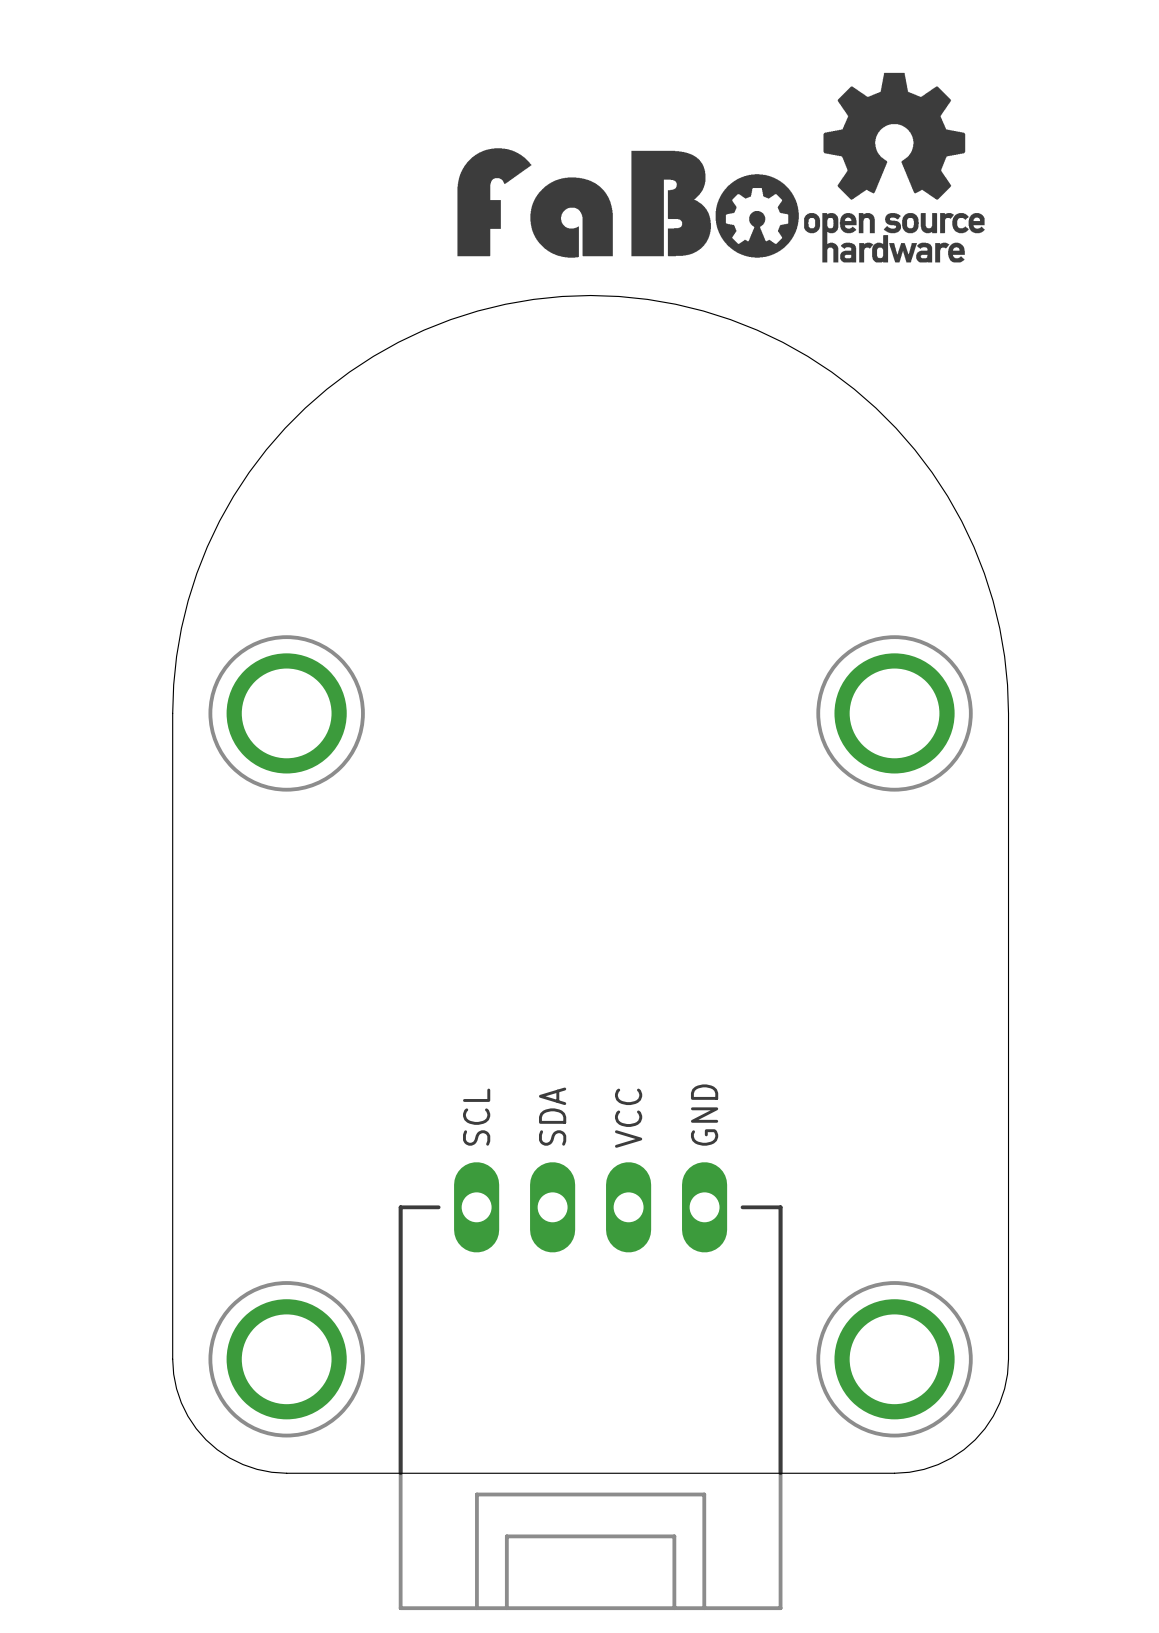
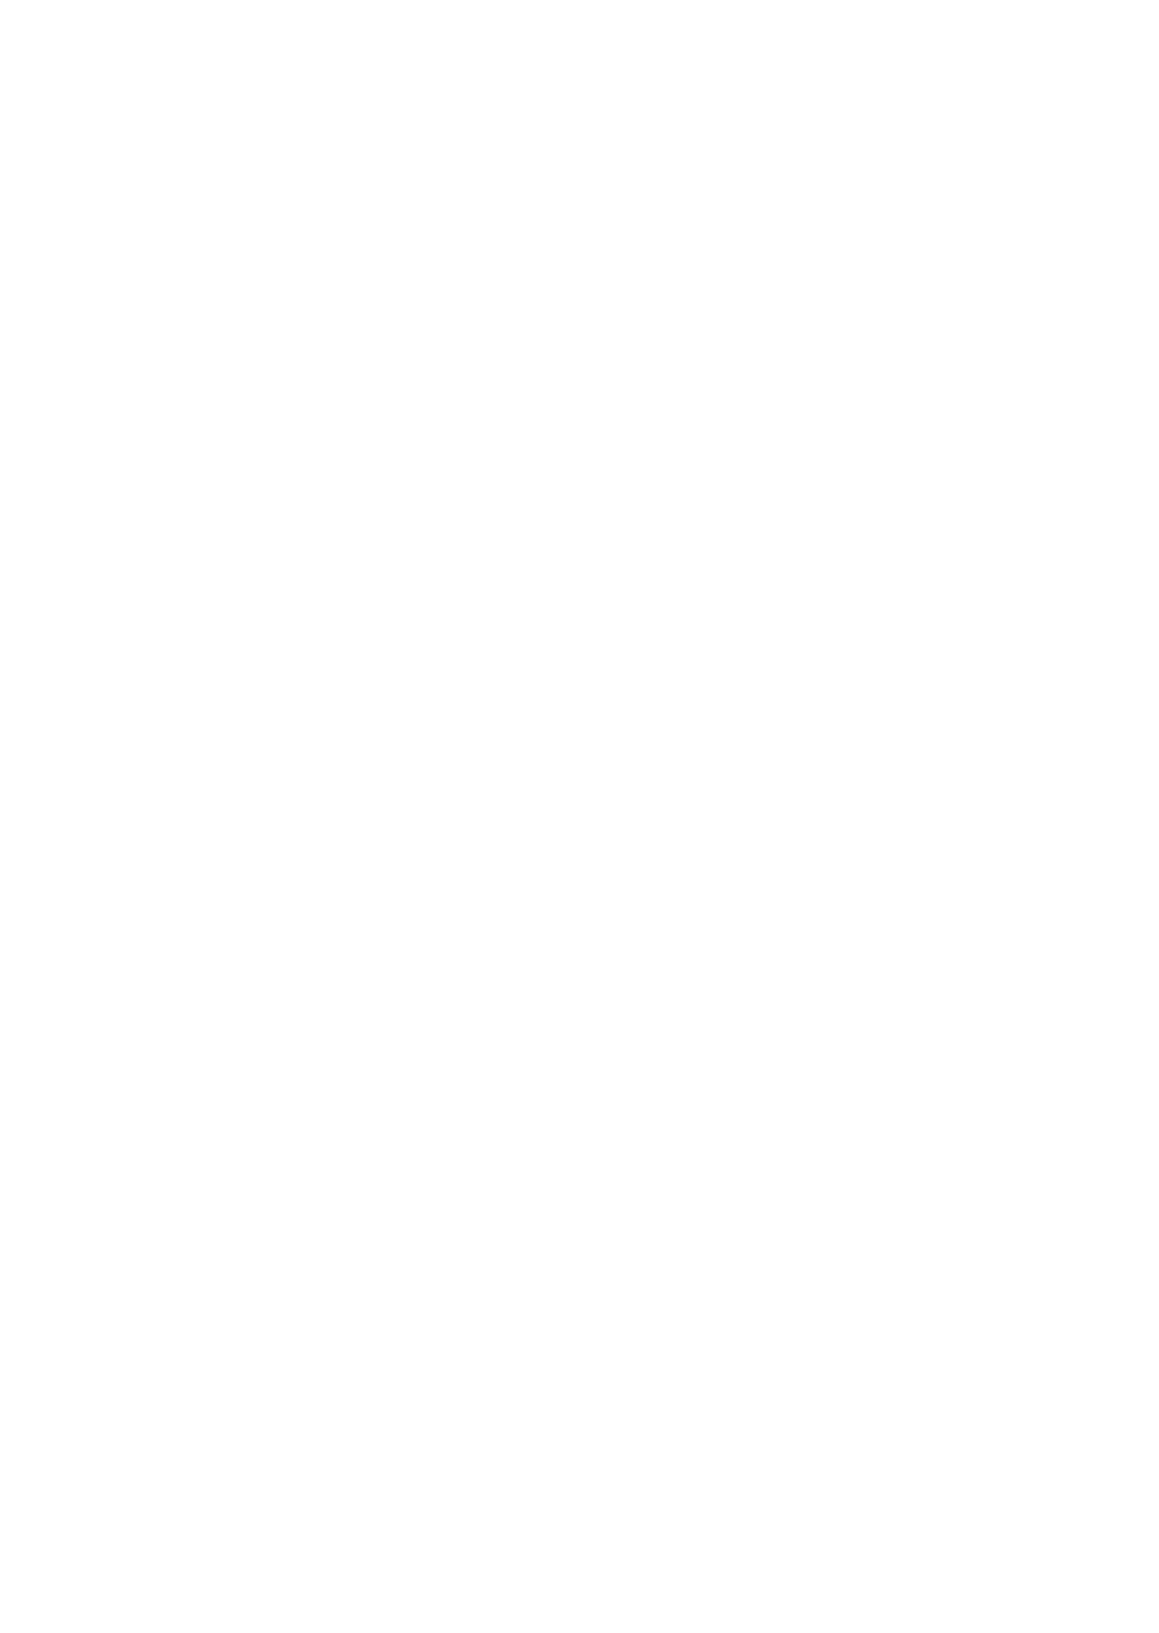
drawing: [457, 72, 985, 263] -> none
part: (590, 952) -> none

